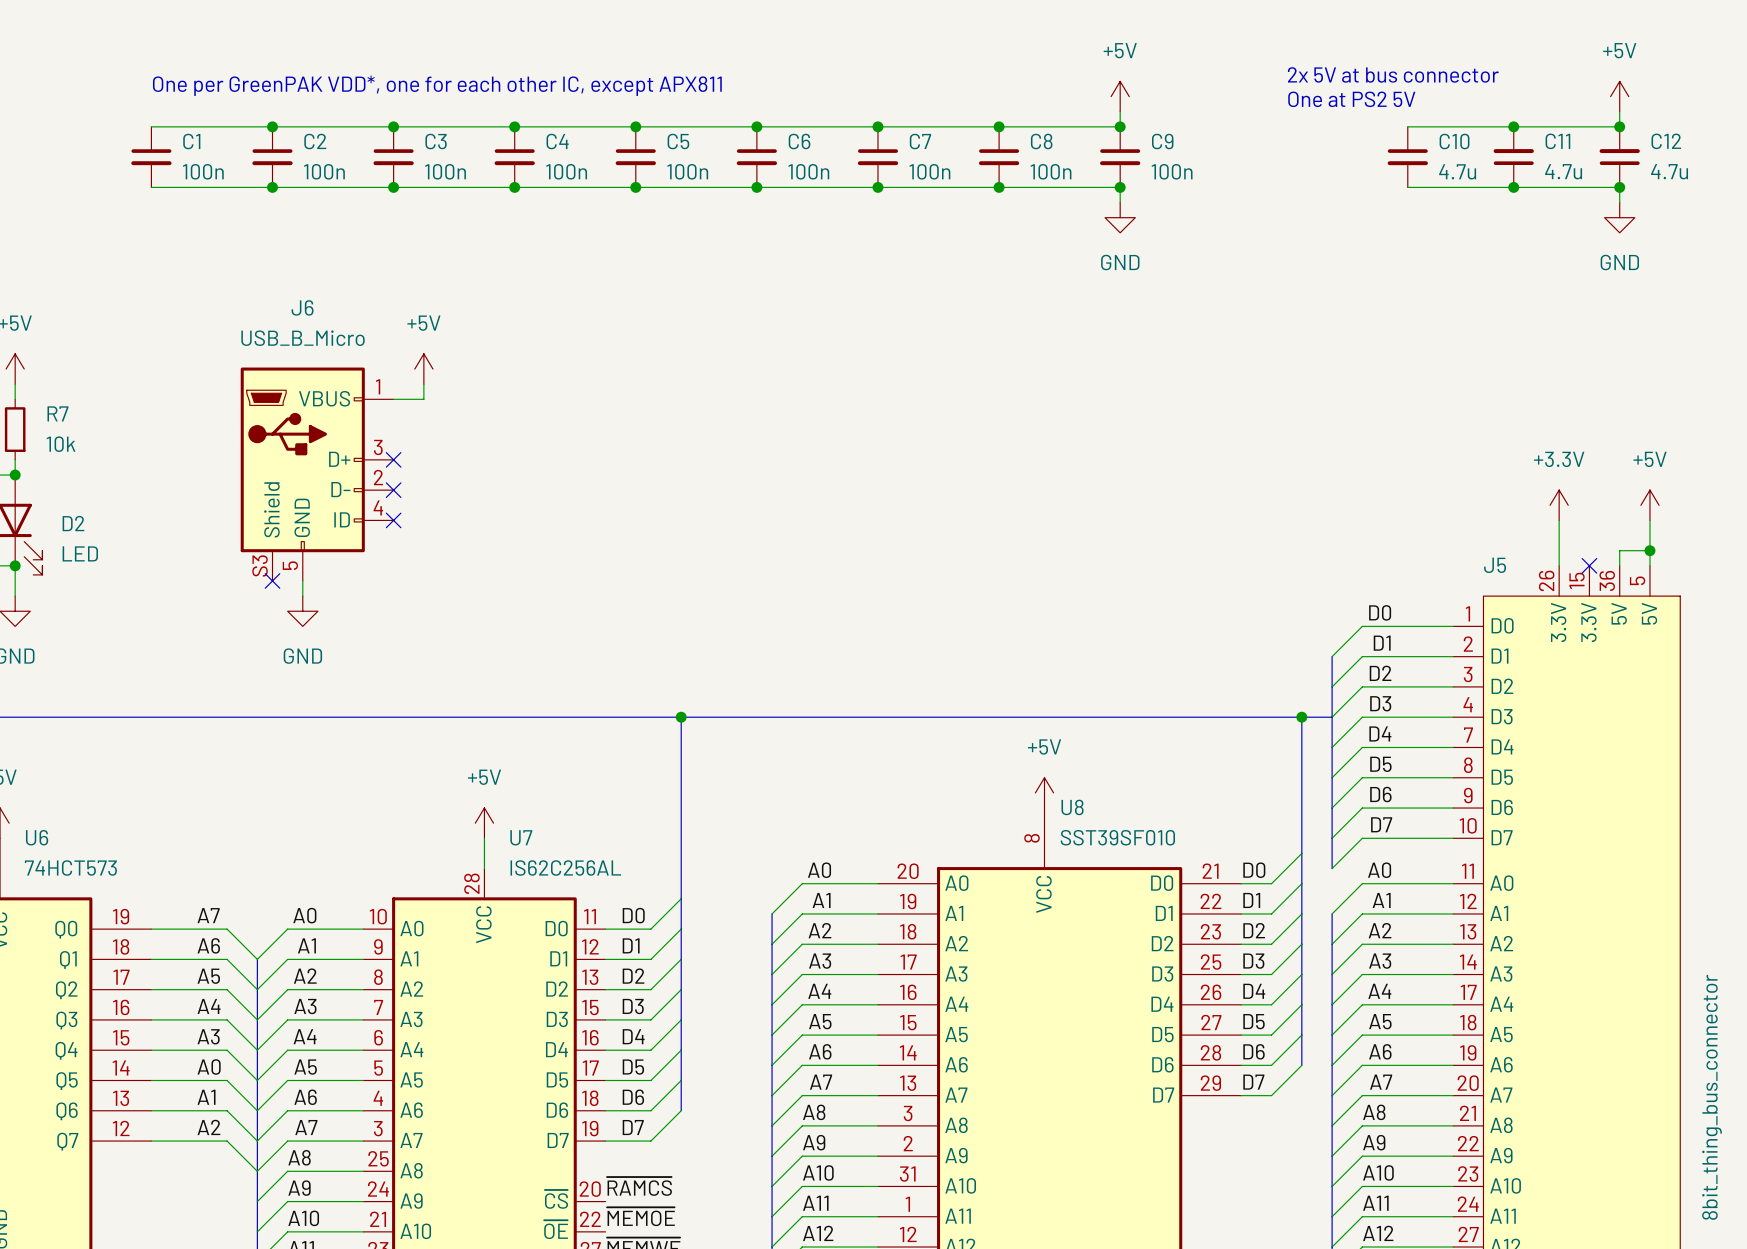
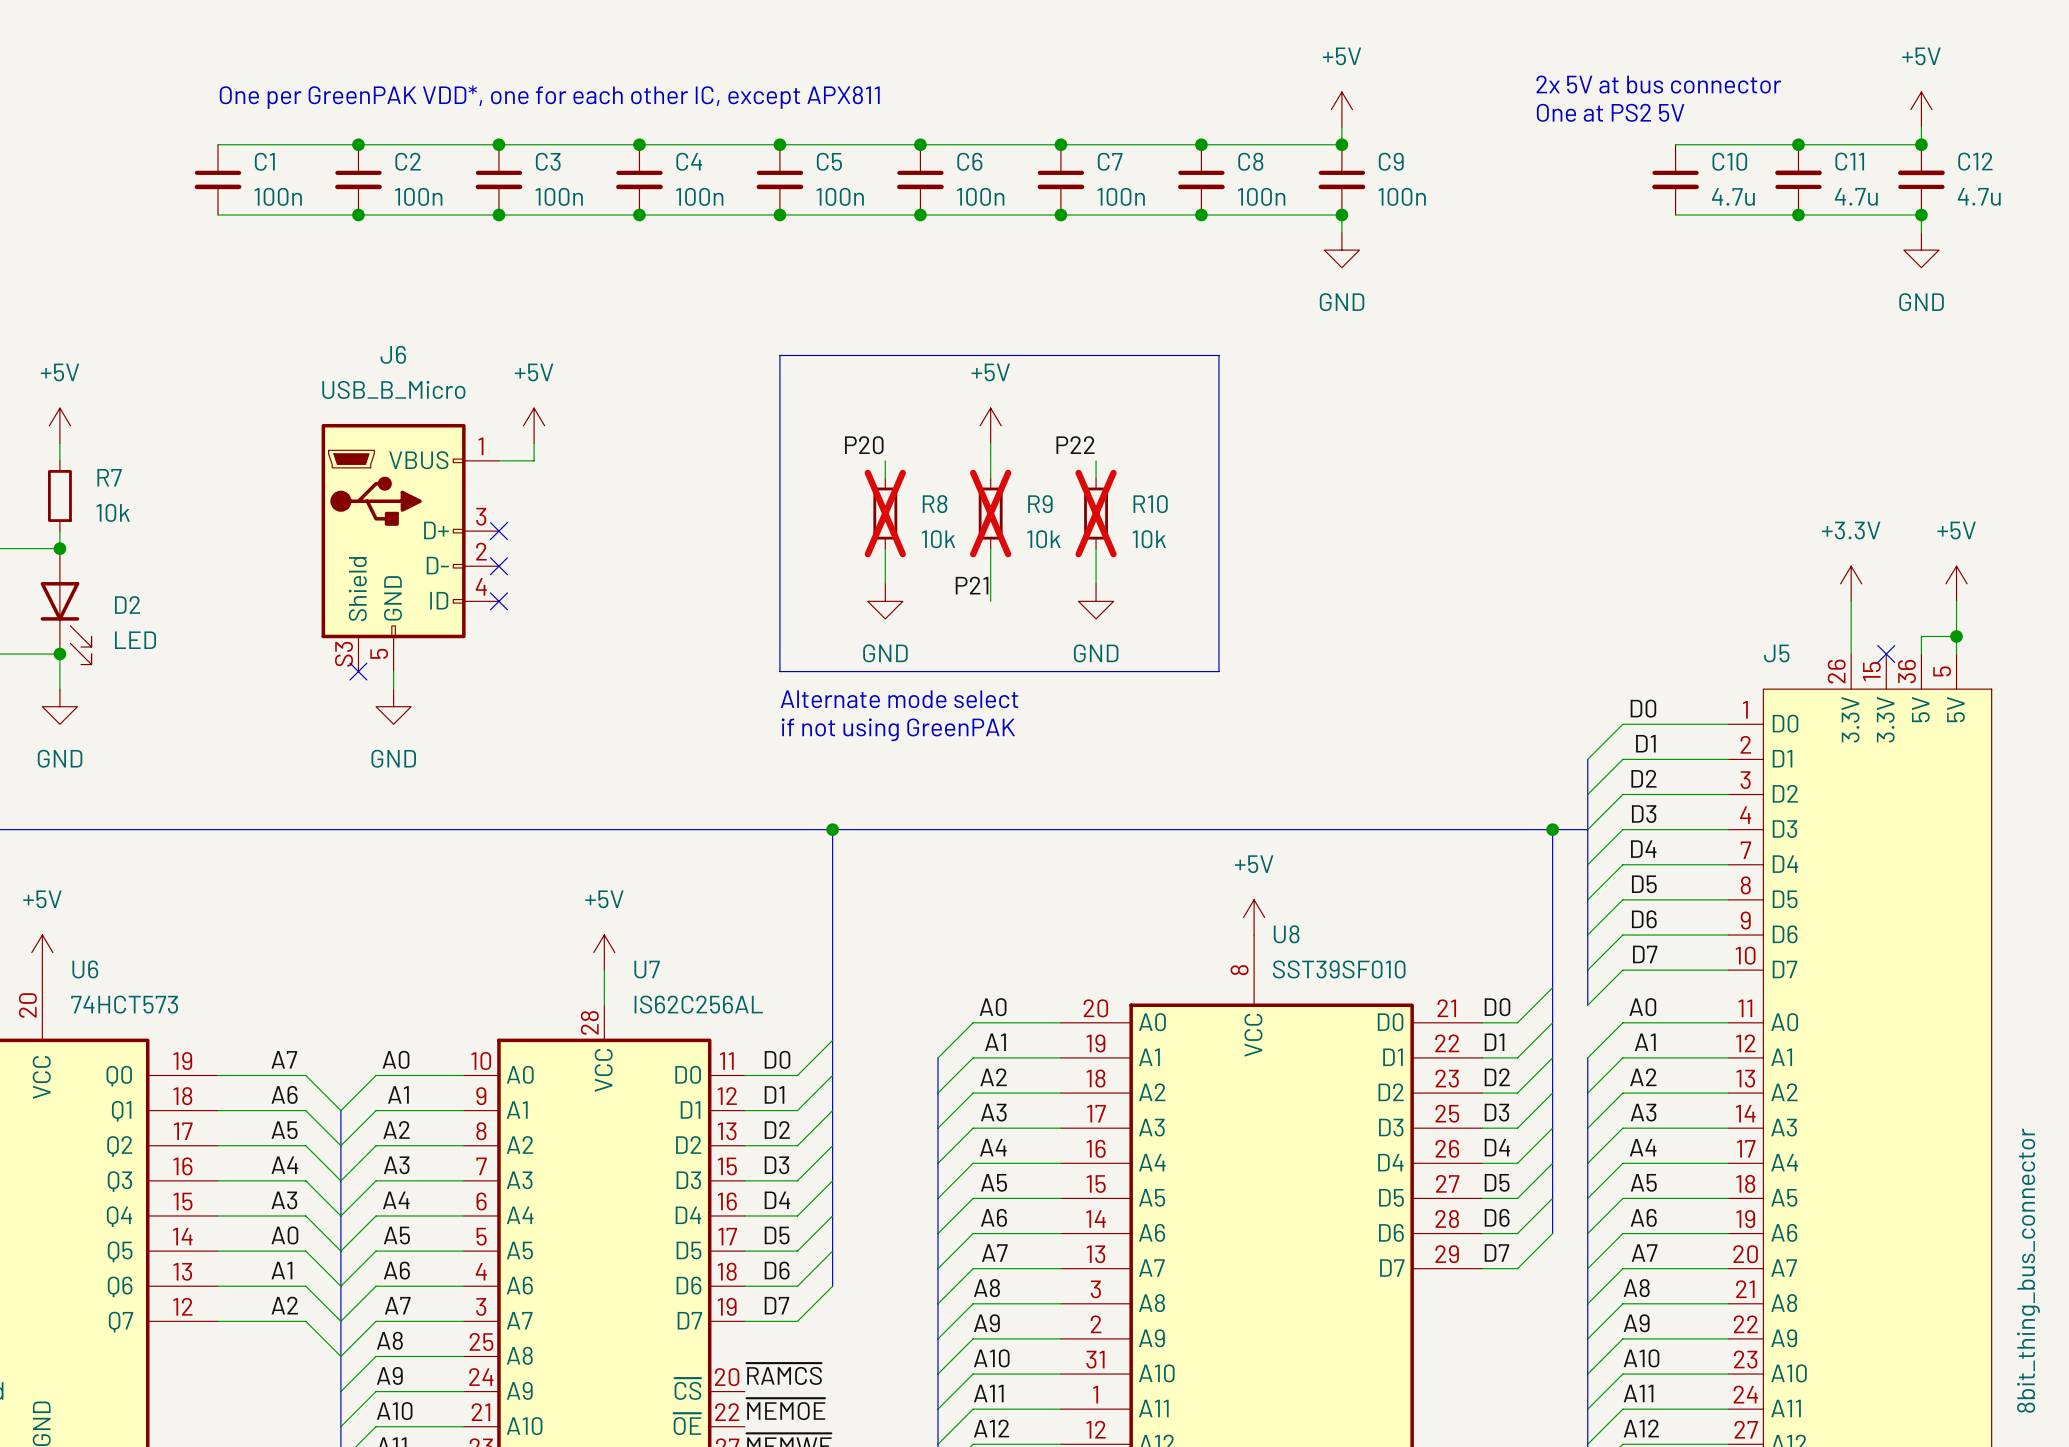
line: none -> (779, 355) (1218, 355) (1218, 671) (779, 671) (779, 355)
power symbol: none -> +5V (990, 425)
wire: none -> (990, 443) (990, 478)
label: none -> P20 (864, 445)
label: none -> P22 (1075, 445)
wire: none -> (885, 460) (885, 478)
wire: none -> (1096, 460) (1096, 478)
R8: none -> 10k (885, 513)
R9: none -> 10k (990, 513)
R10: none -> 10k (1096, 513)
wire: none -> (885, 548) (885, 583)
wire: none -> (990, 548) (990, 601)
wire: none -> (1096, 548) (1096, 583)
label: none -> P21 (972, 585)
power symbol: none -> GND (885, 601)
power symbol: none -> GND (1096, 601)
text: none -> Alternate mode select (899, 699)
text: none -> if not using GreenPAK (898, 729)

